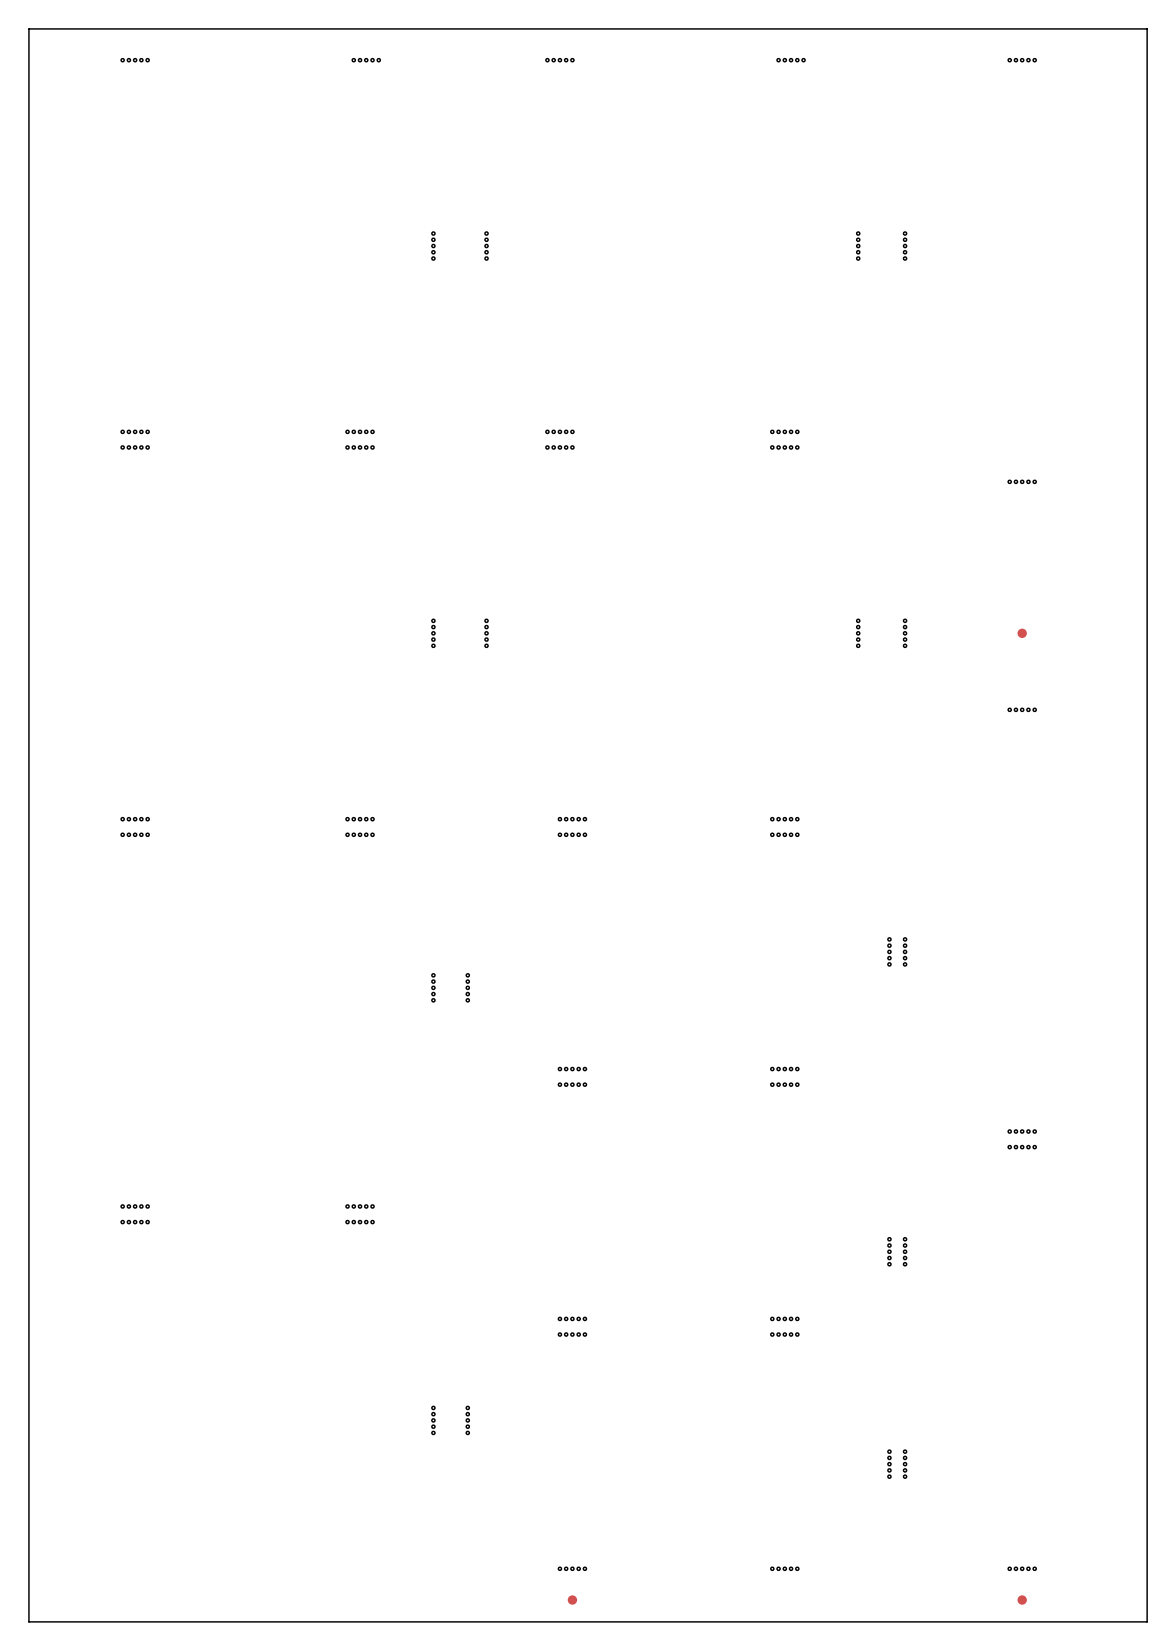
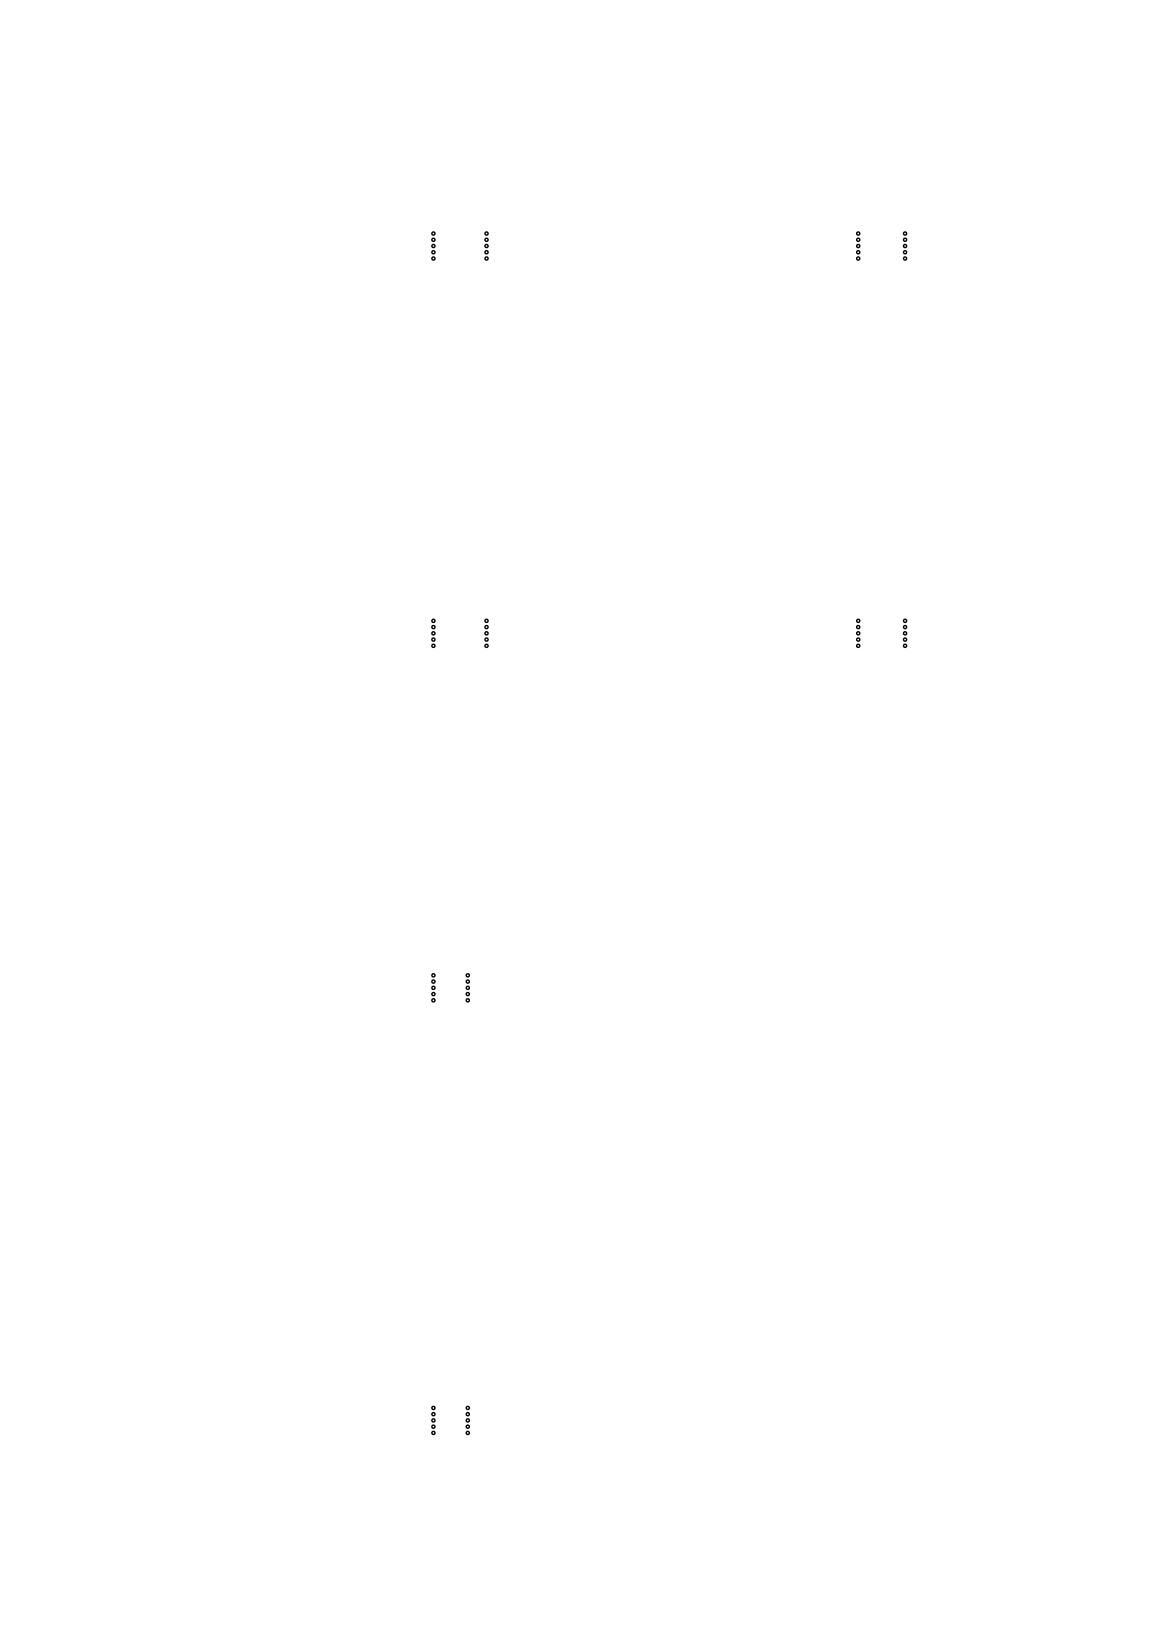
board edge: (28, 28) (28, 1621) (1147, 1621) (1147, 28) (28, 28) -> none
part: (135, 60) -> none
part: (366, 60) -> none
part: (559, 60) -> none
part: (791, 60) -> none
part: (1022, 60) -> none
part: (135, 439) -> none
part: (360, 439) -> none
part: (559, 439) -> none
part: (784, 439) -> none
part: (1022, 481) -> none
part: (1022, 633) -> none
part: (1022, 709) -> none
part: (135, 826) -> none
part: (360, 826) -> none
part: (572, 826) -> none
part: (784, 826) -> none
part: (897, 951) -> none
part: (572, 1076) -> none
part: (784, 1076) -> none
part: (1022, 1139) -> none
part: (135, 1214) -> none
part: (360, 1214) -> none
part: (897, 1251) -> none
part: (572, 1326) -> none
part: (784, 1326) -> none
part: (897, 1464) -> none
part: (572, 1568) -> none
part: (784, 1568) -> none
part: (1022, 1568) -> none
part: (572, 1600) -> none
part: (1022, 1600) -> none

